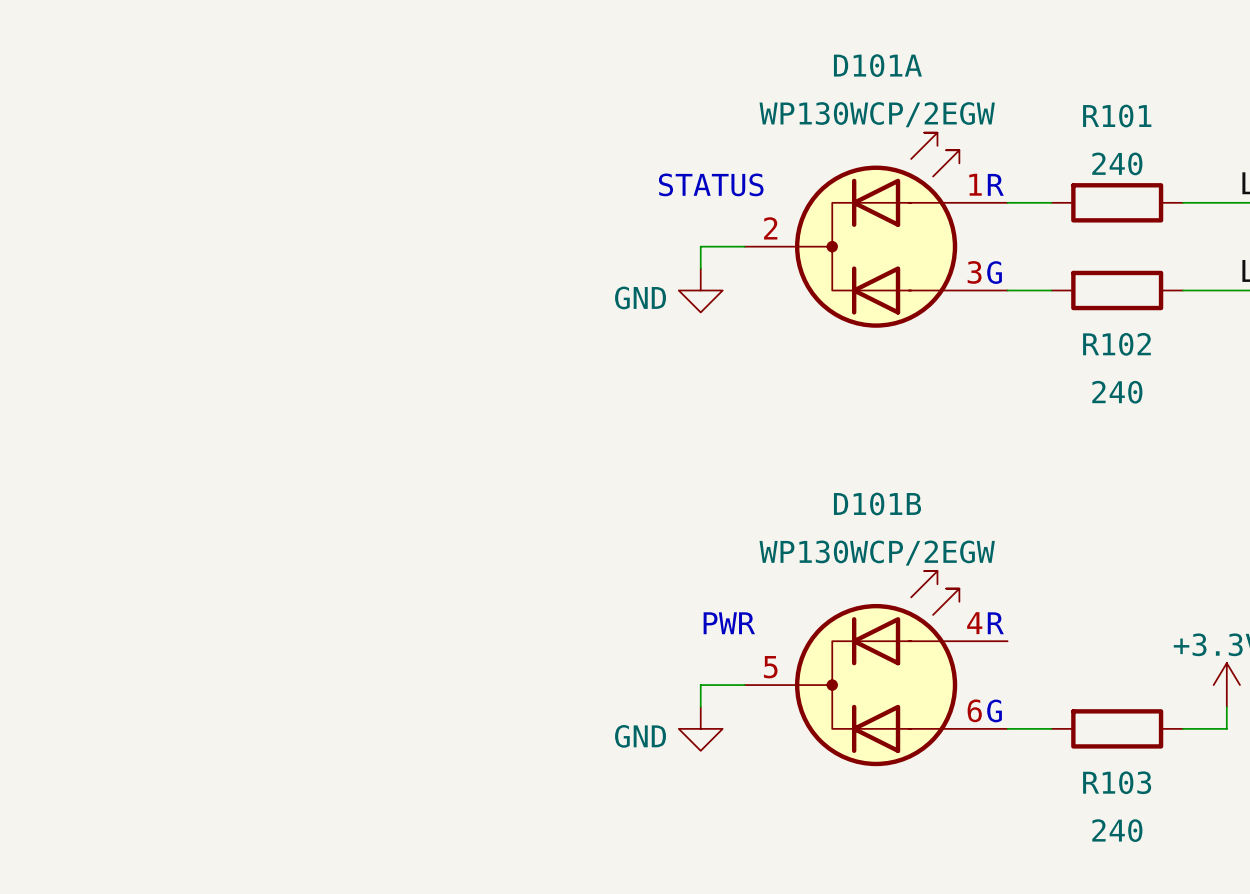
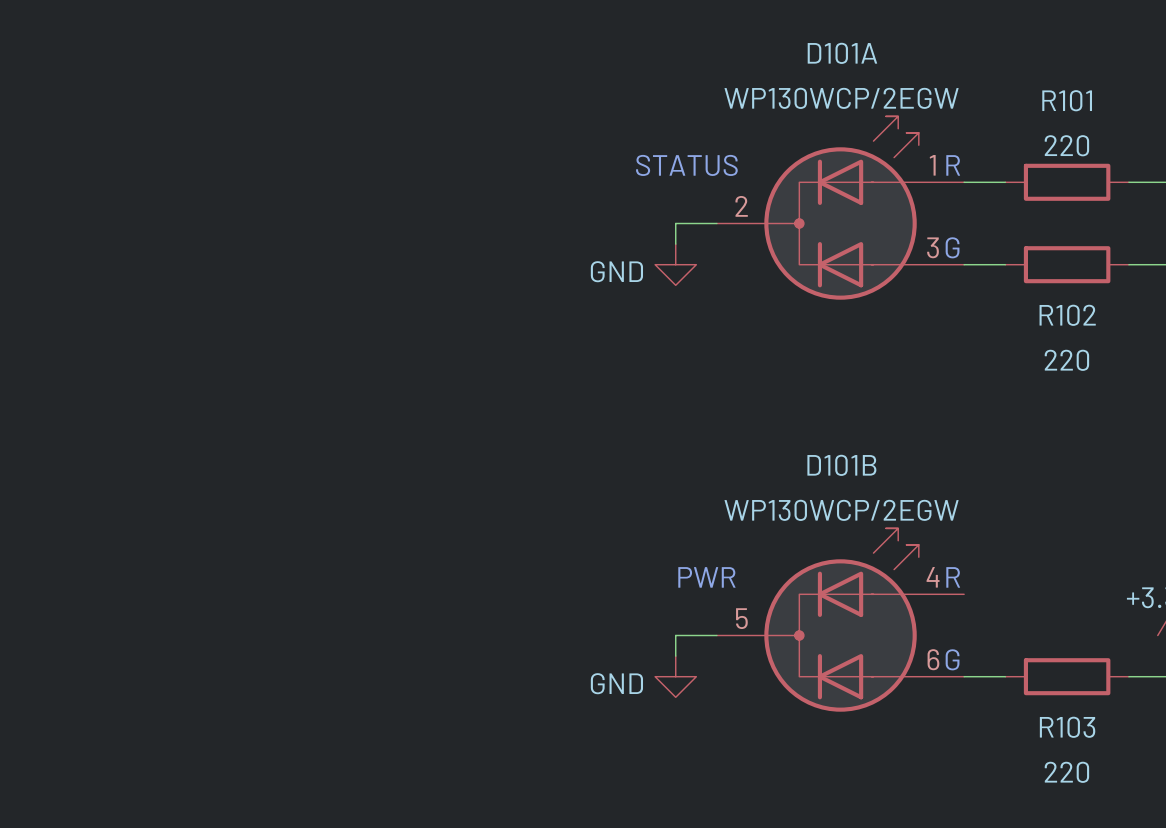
R101 value: 240 (1117, 163) -> 220 (1066, 145)
R102 value: 240 (1117, 392) -> 220 (1066, 360)
R103 value: 240 (1117, 830) -> 220 (1066, 772)

